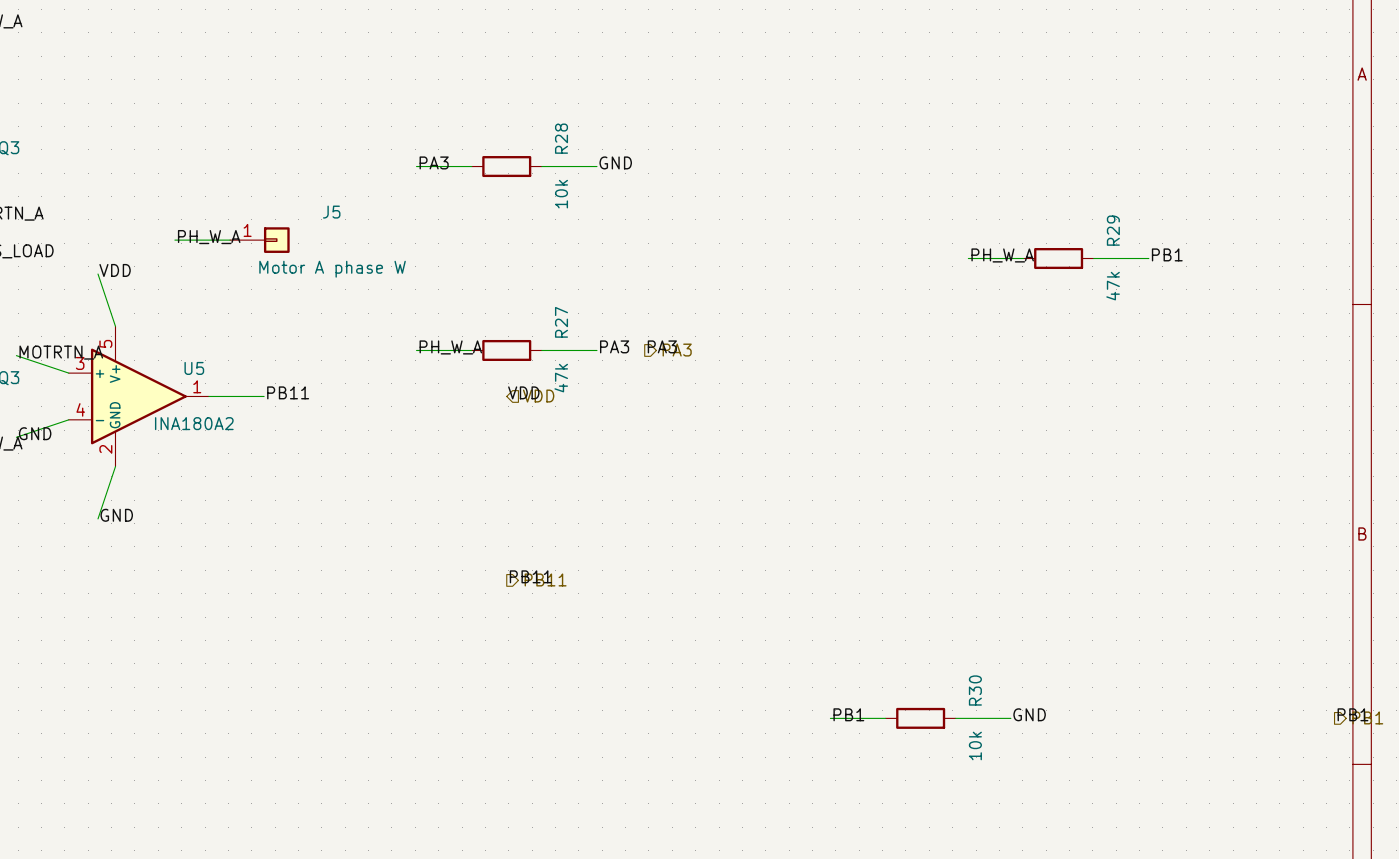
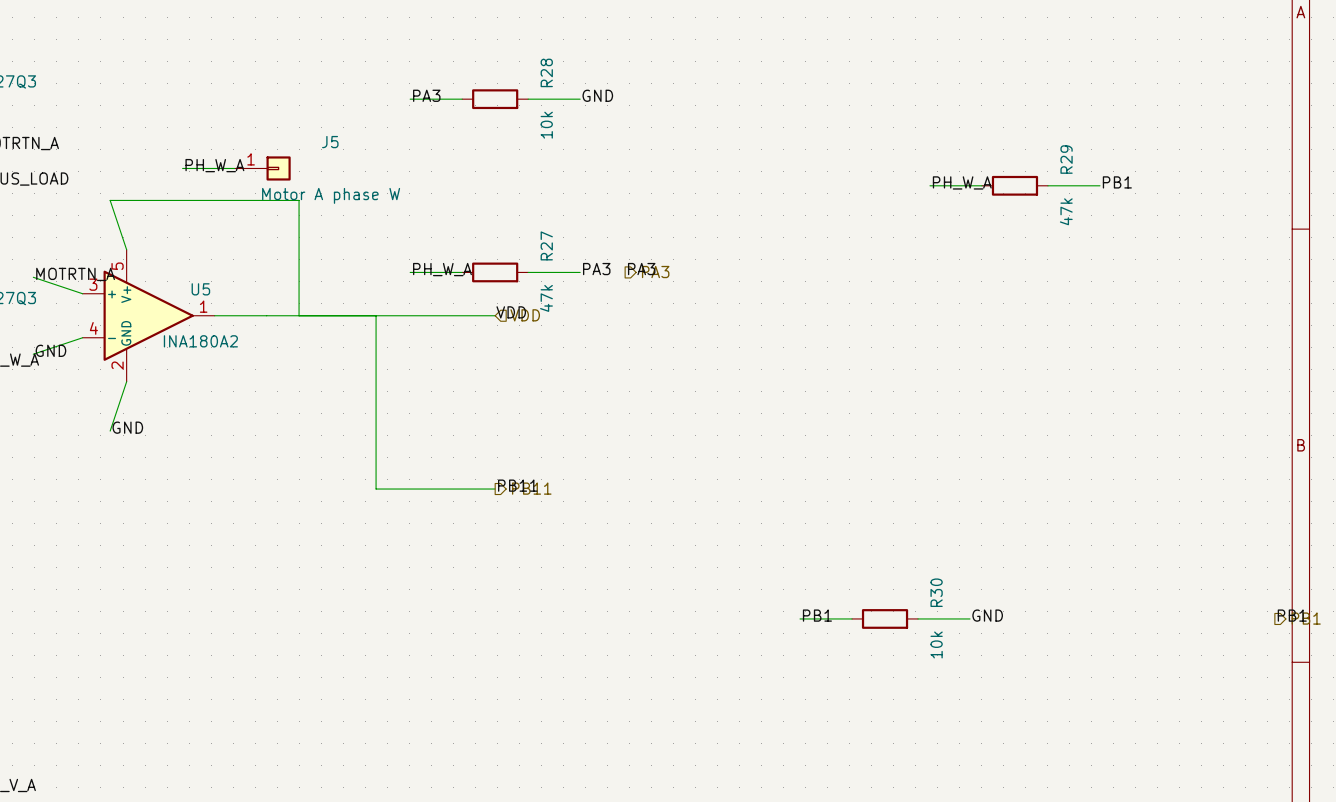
label: VDD (115, 270) -> none
wire: none -> (110, 200) (299, 200) (299, 315)
label: PB11 (288, 392) -> none
wire: none -> (266, 315) (495, 315)
wire: none -> (376, 315) (376, 489) (495, 489)

